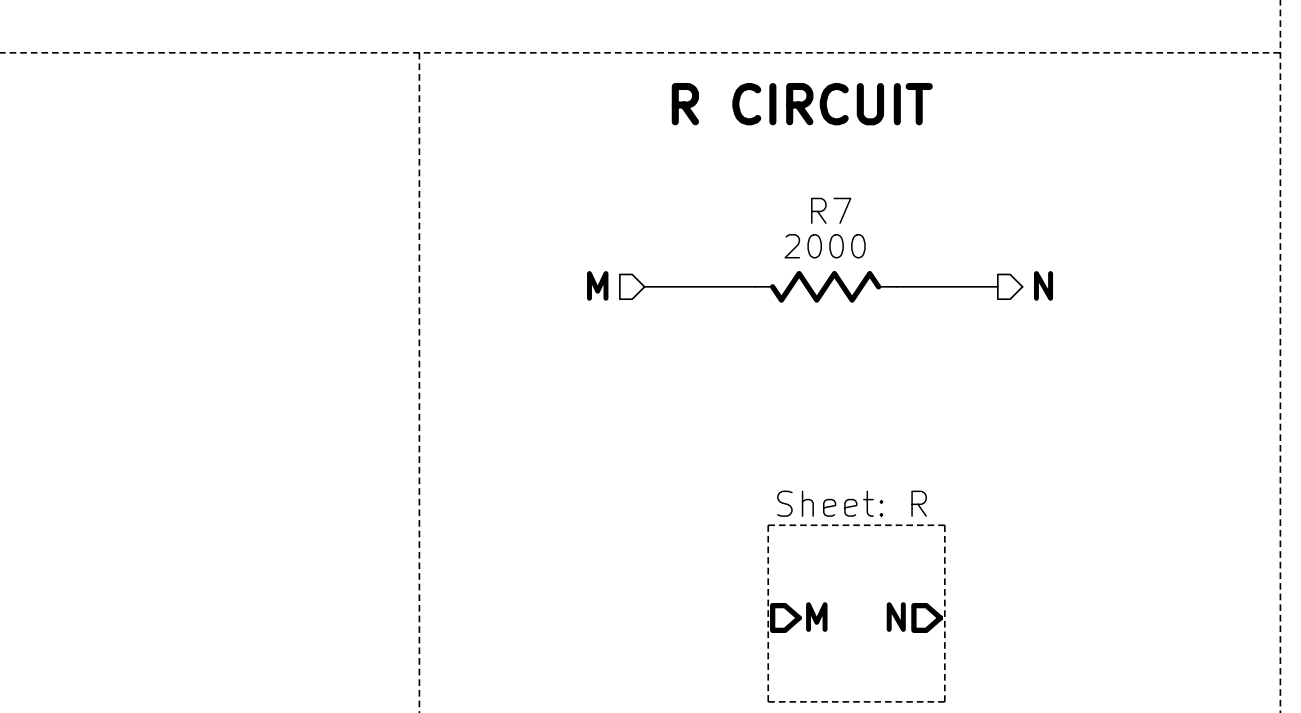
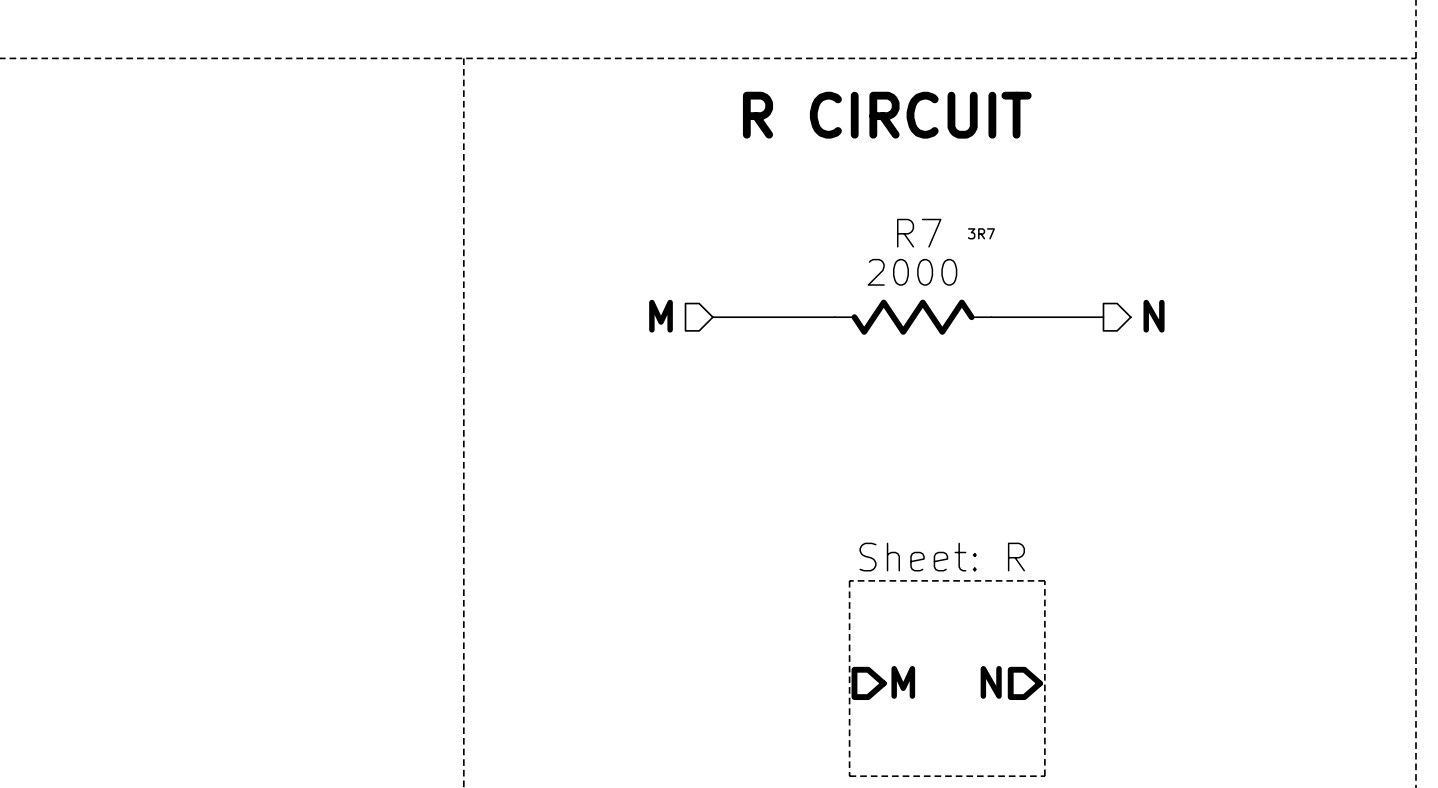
3R7 name: none -> 3R7 (981, 233)

